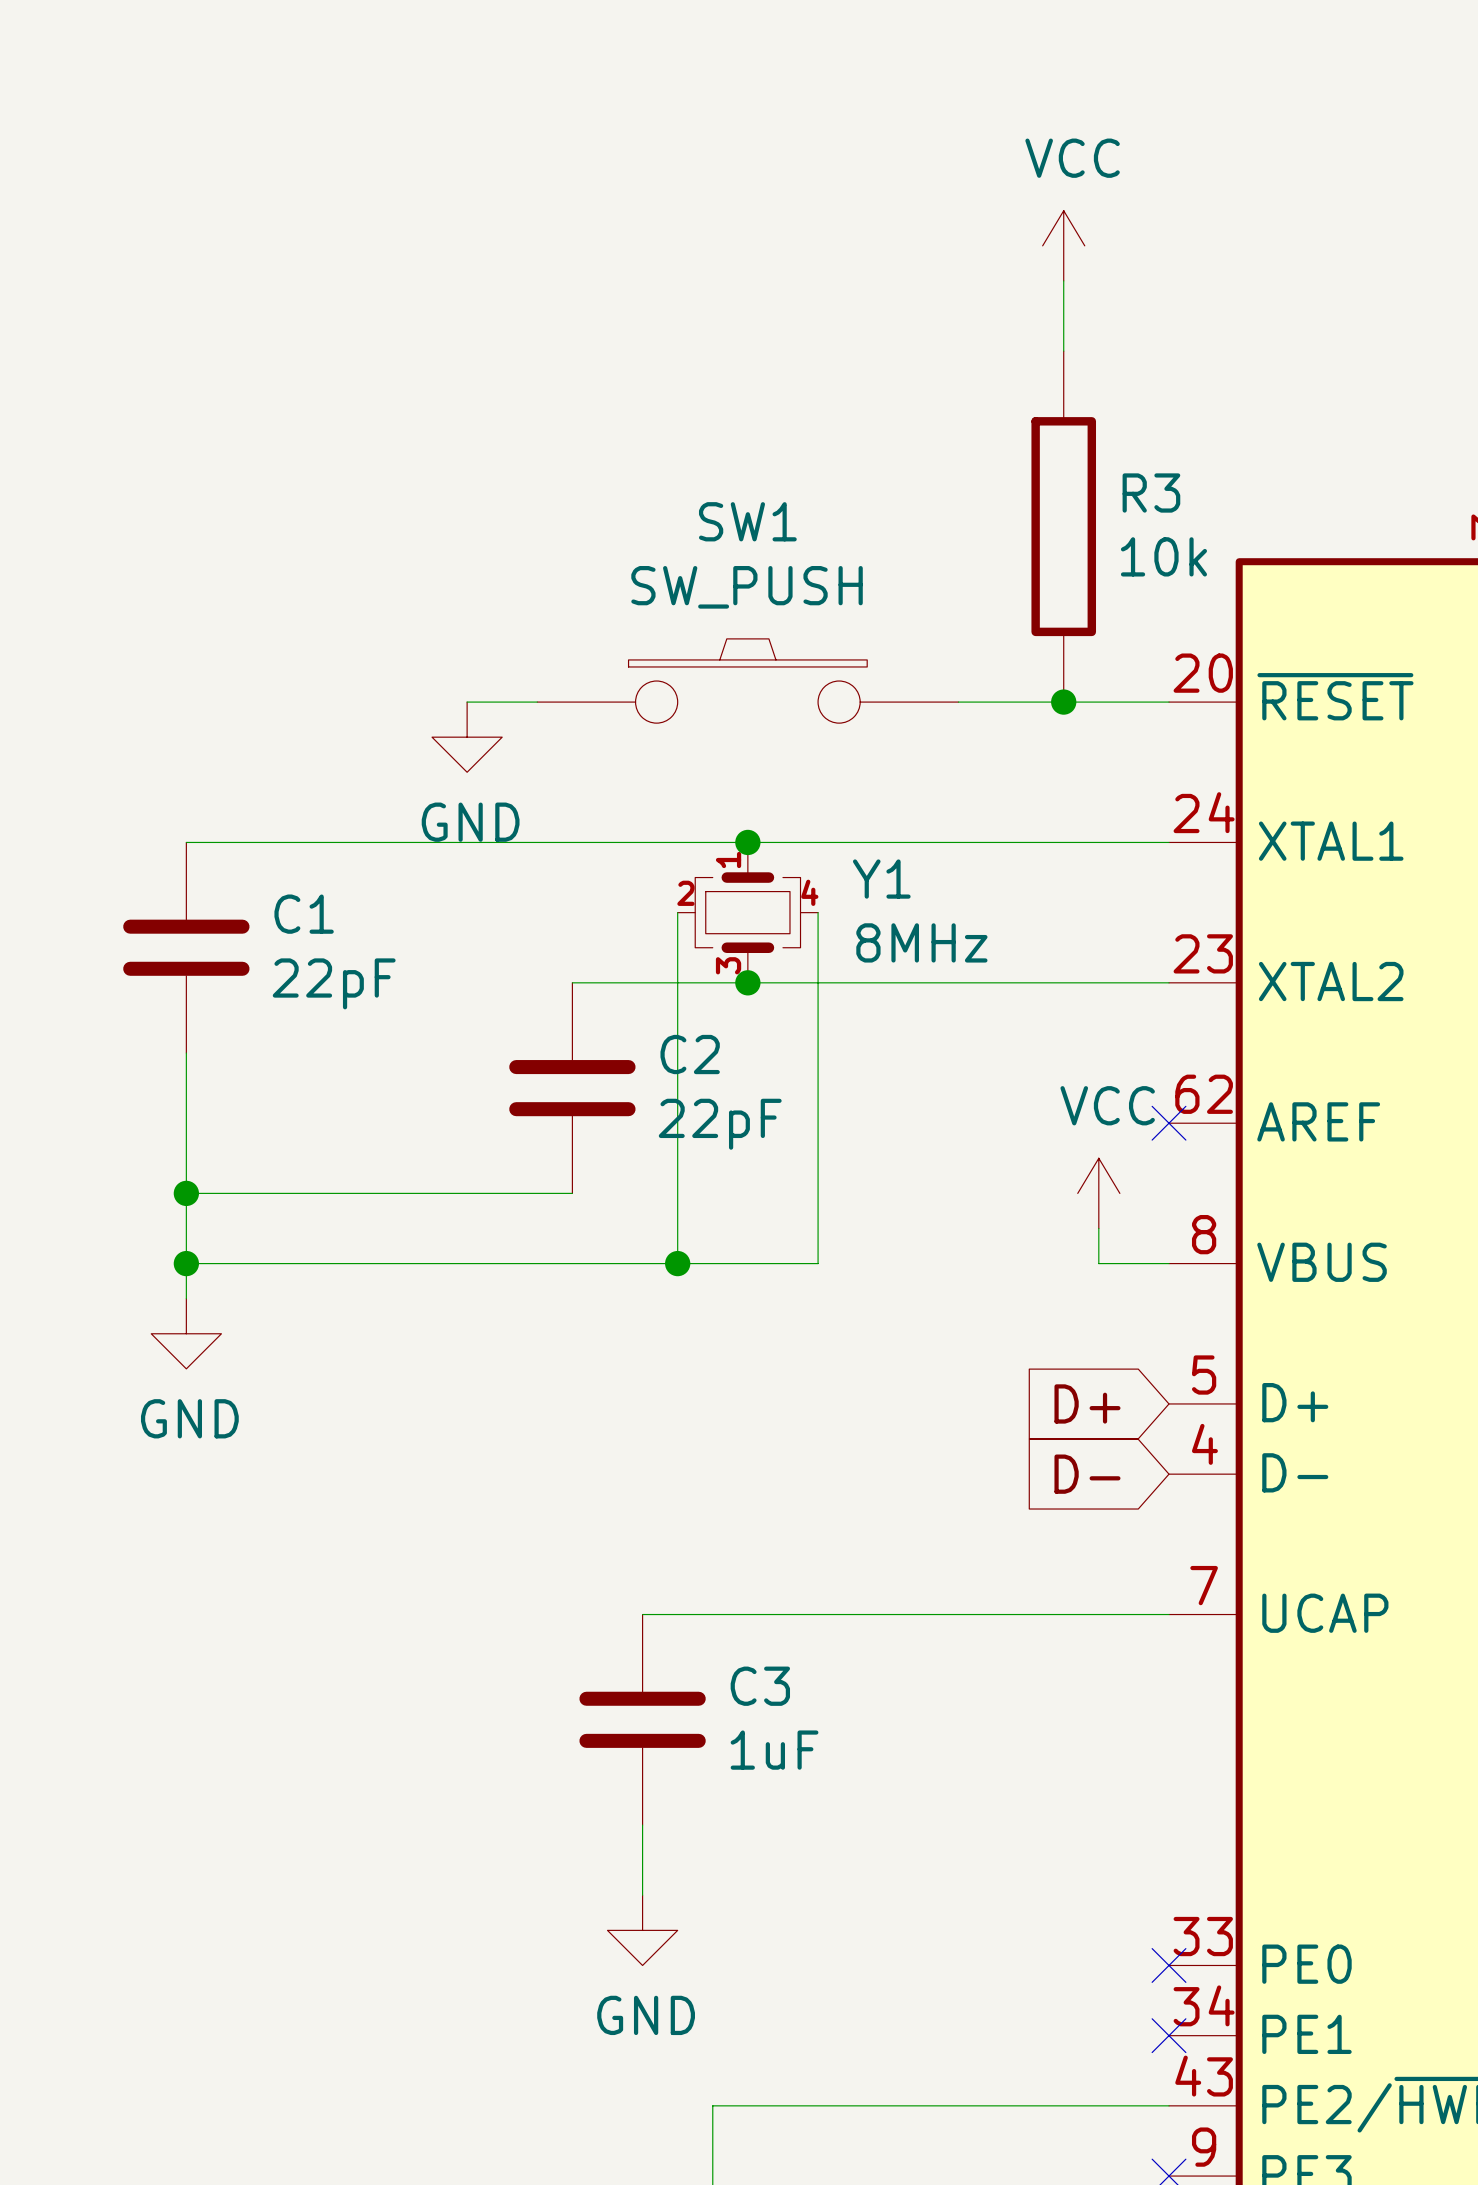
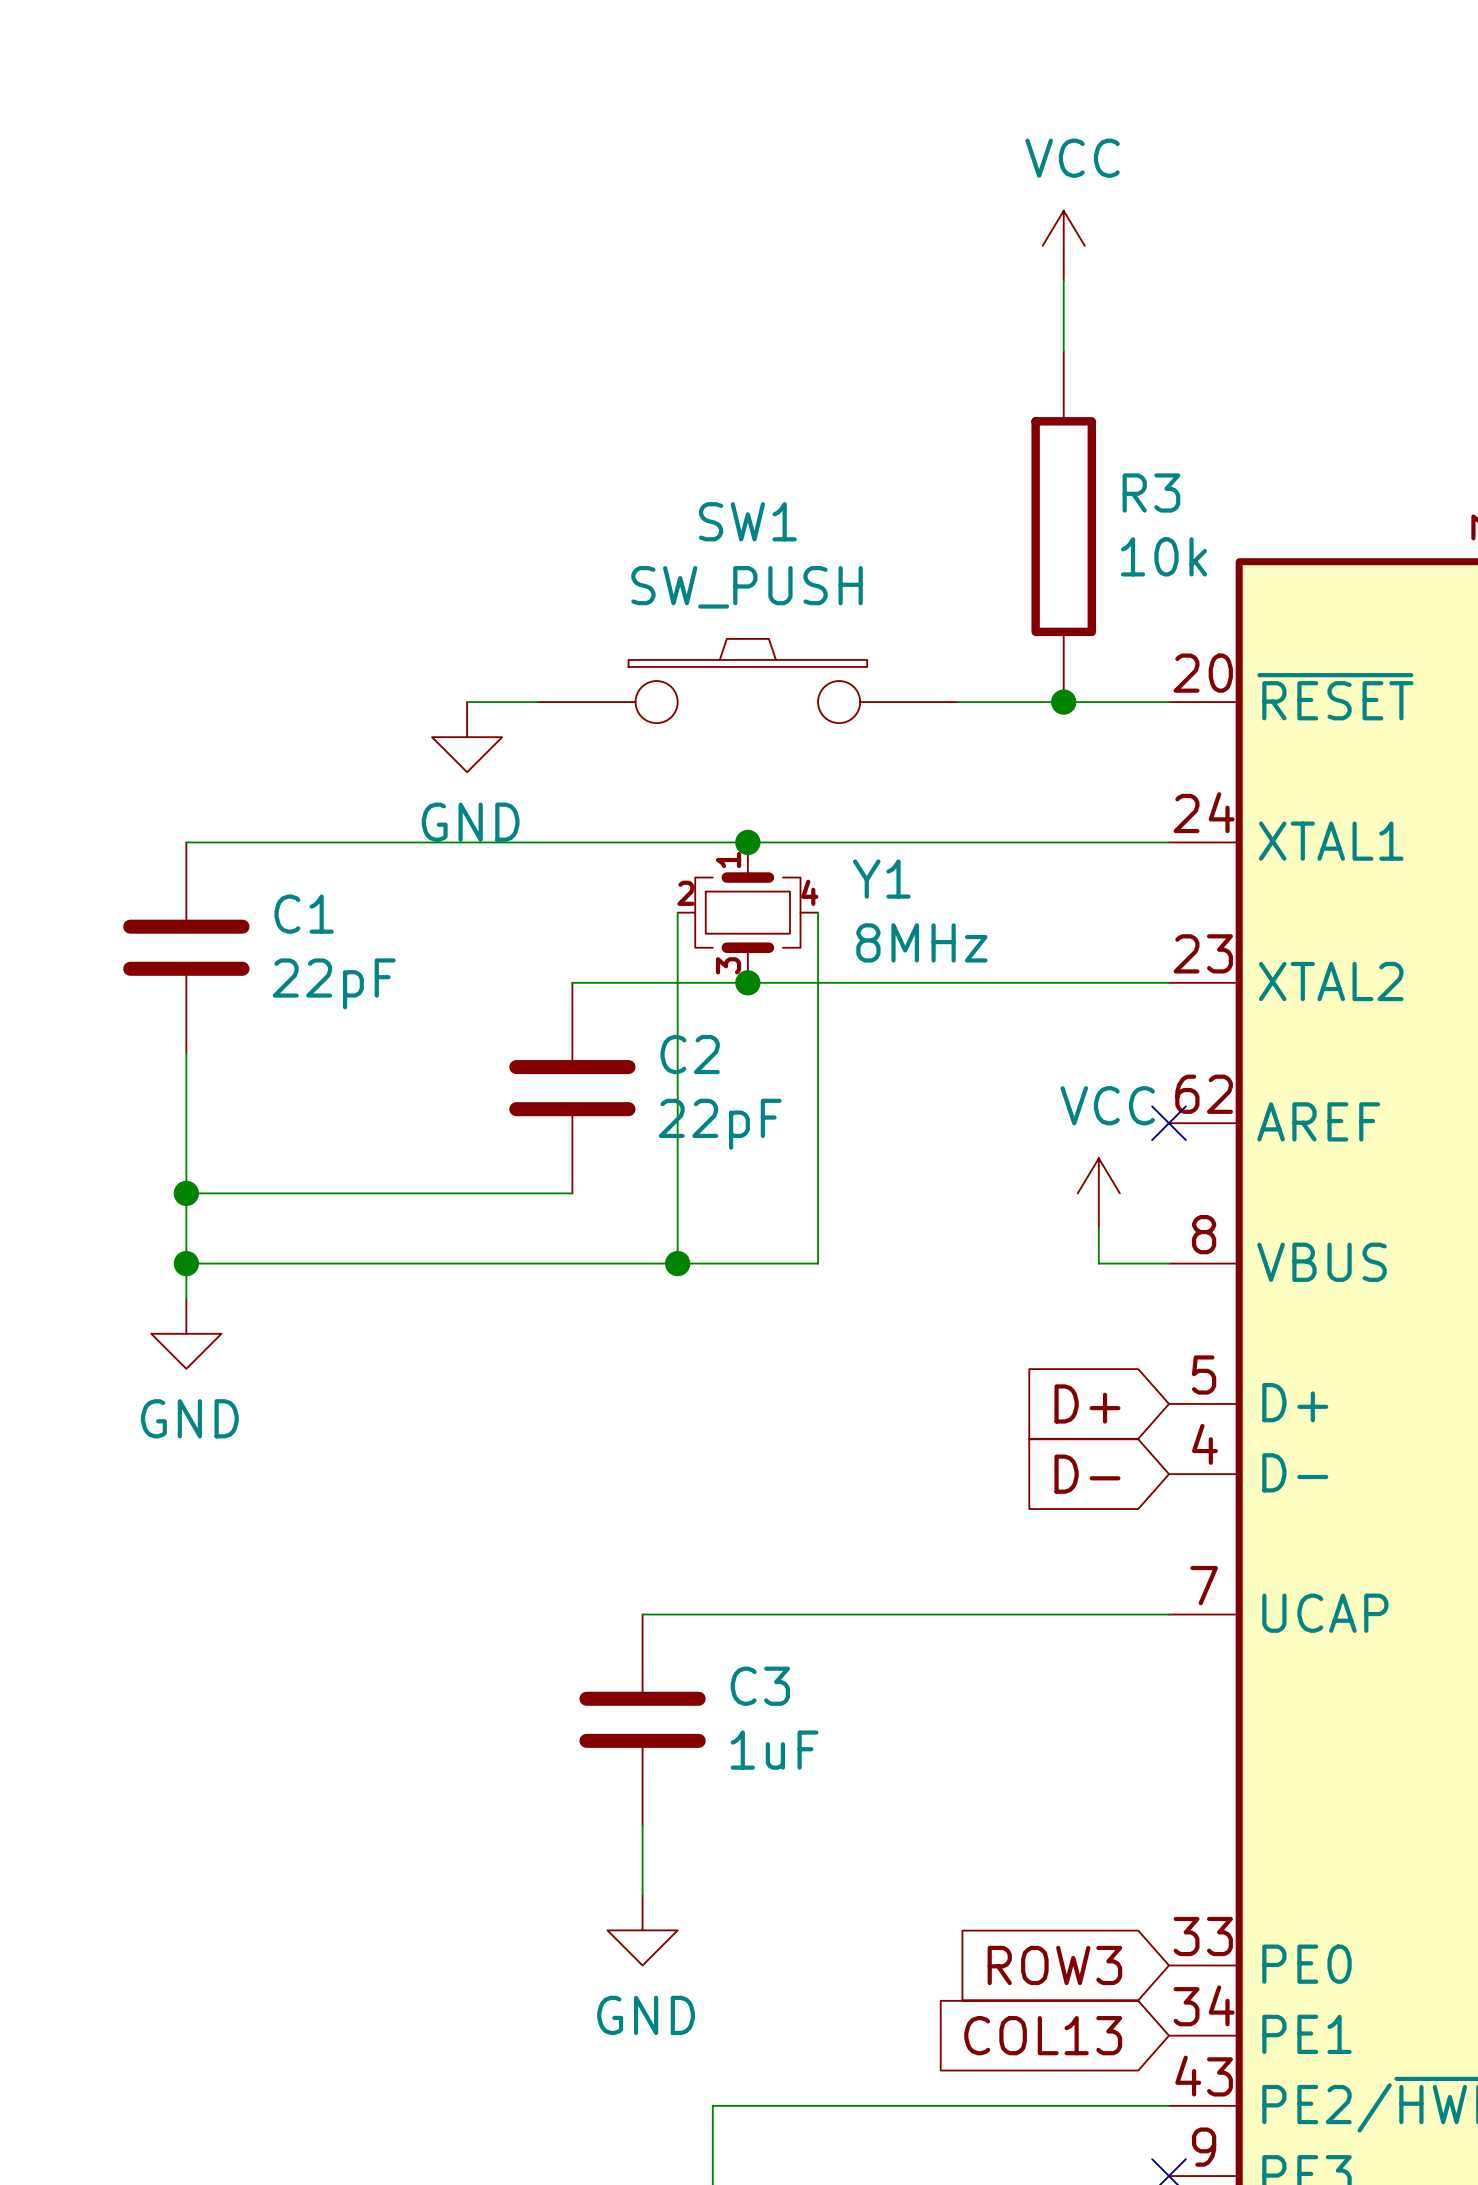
global label: none -> ROW3 (1054, 1965)
no-connect mark: (1169, 1965) -> none
global label: none -> COL13 (1043, 2035)
no-connect mark: (1169, 2035) -> none

